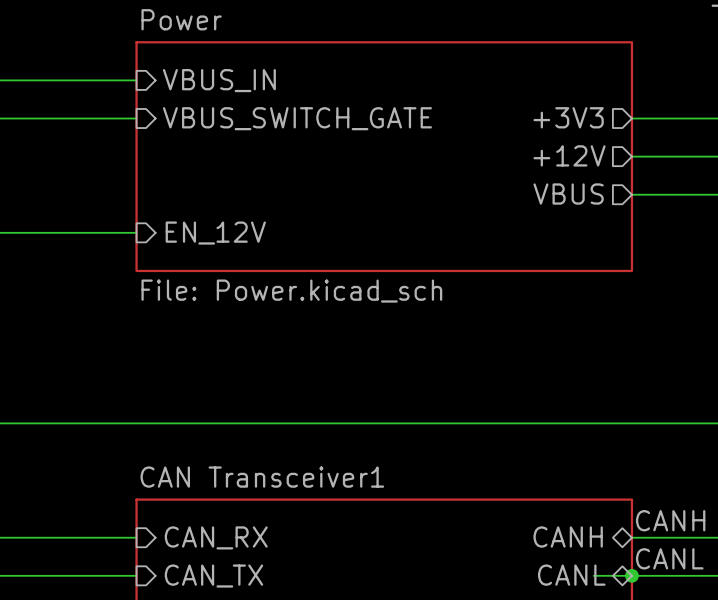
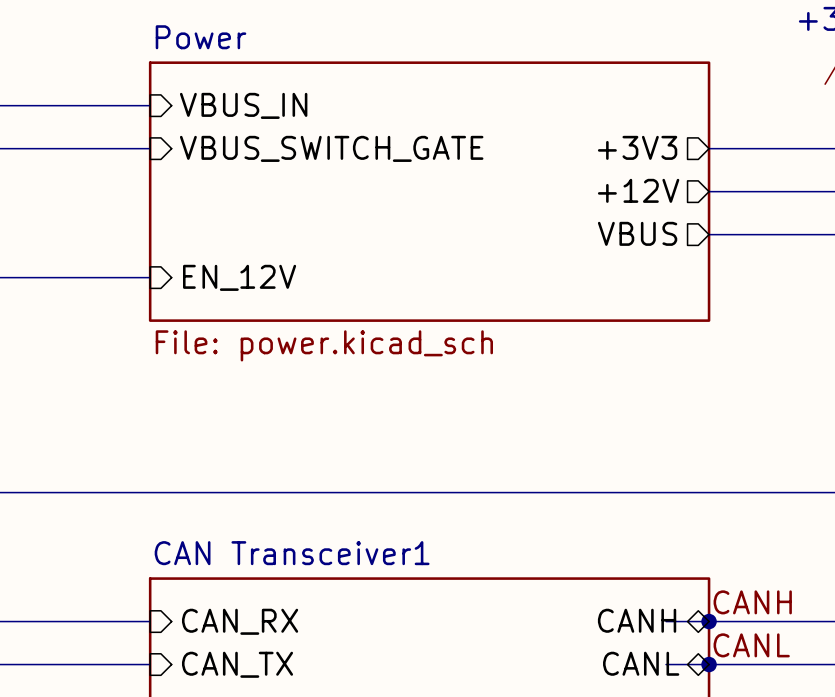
sheet Power value: File: Power.kicad_sch (291, 291) -> File: power.kicad_sch (324, 345)
wire: none -> (666, 621) (709, 621)
junction: none -> (709, 621)

